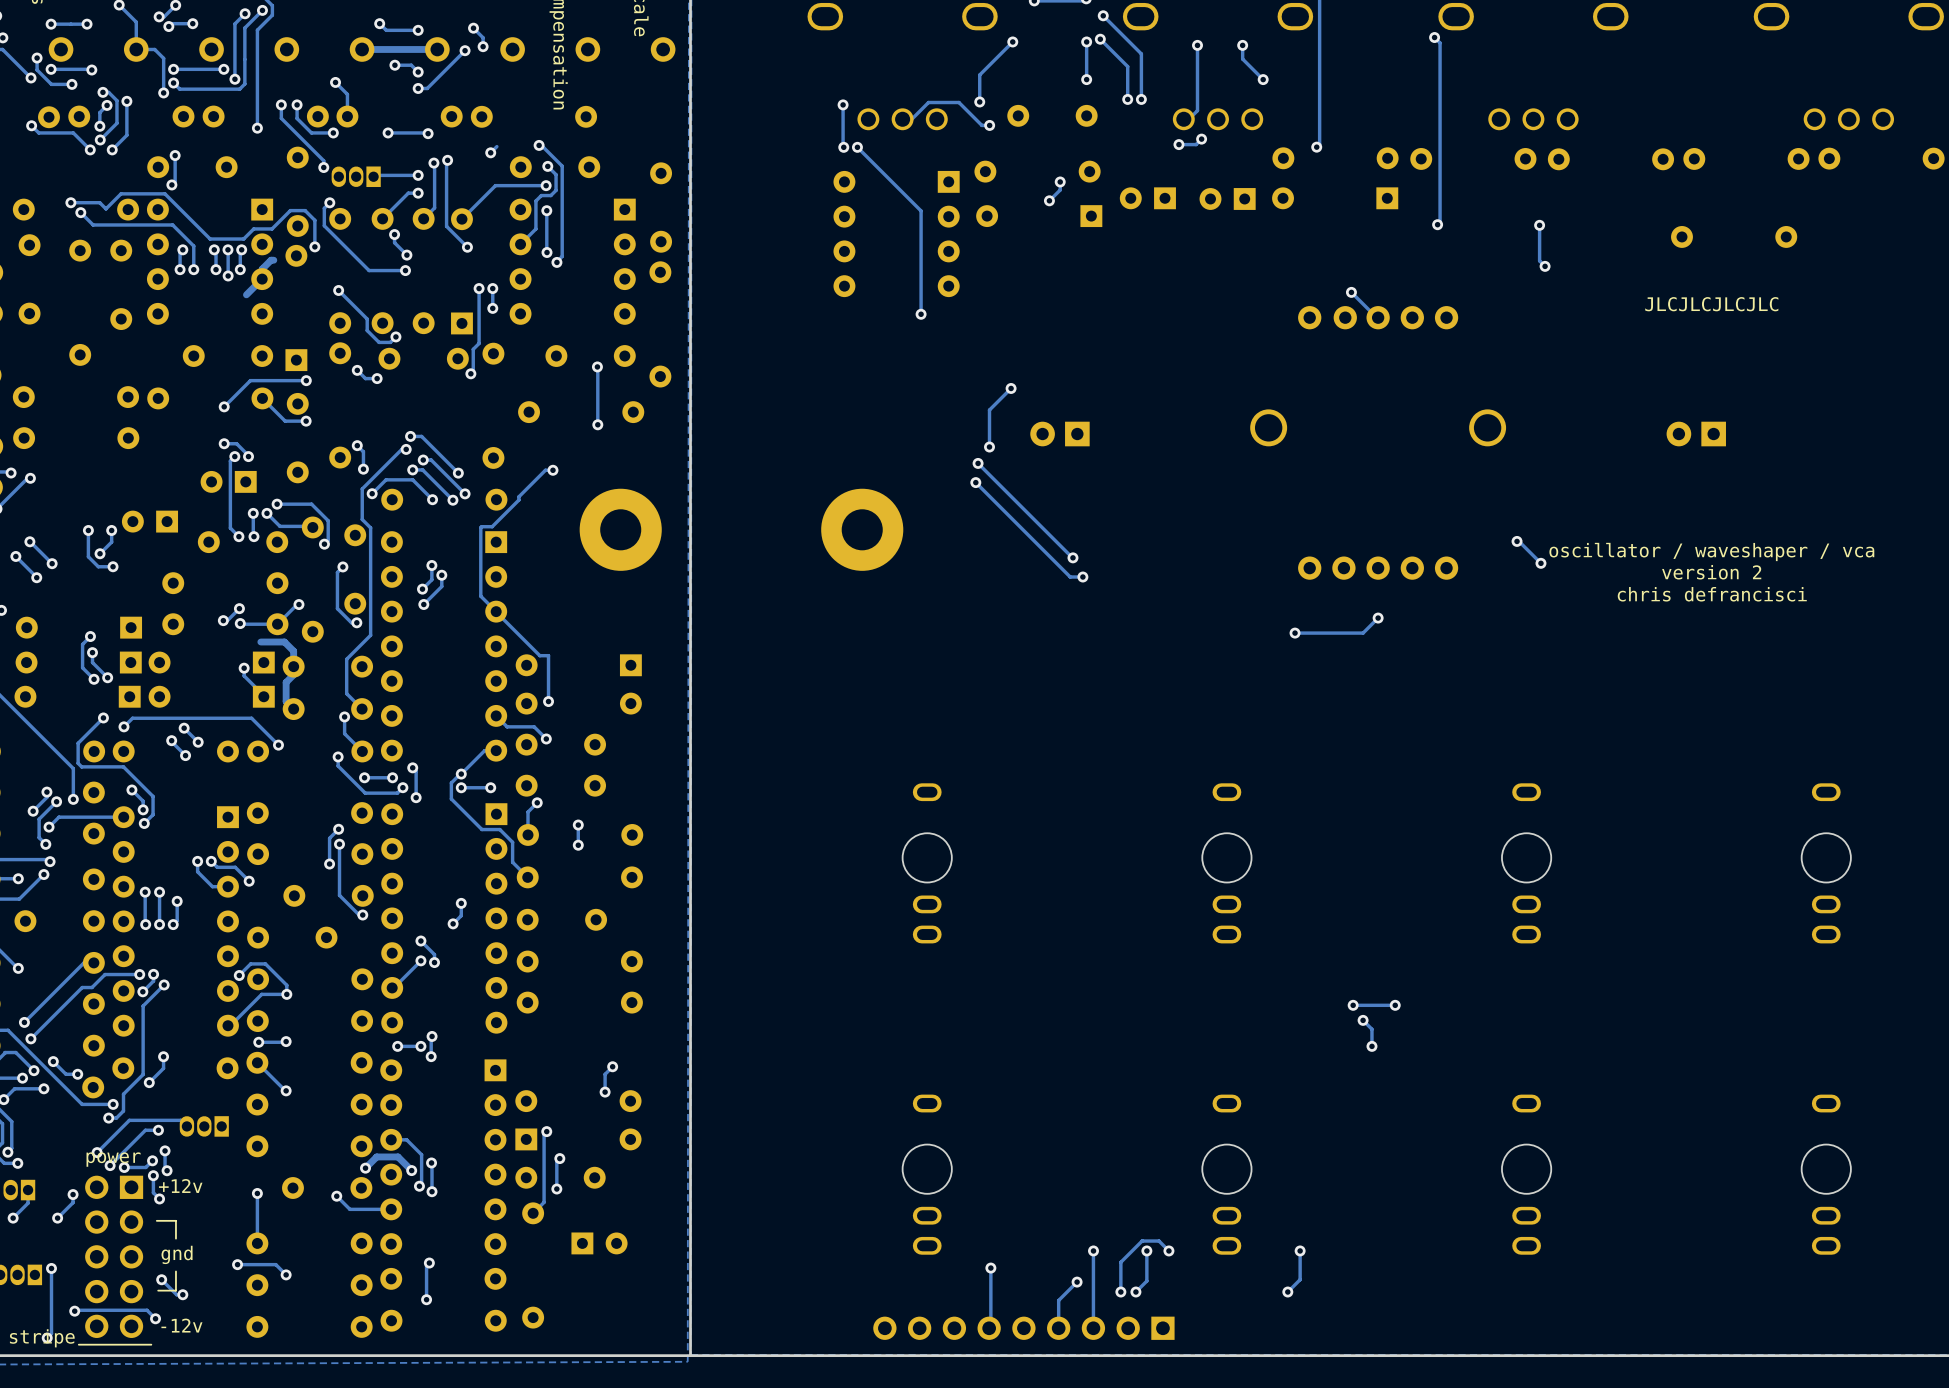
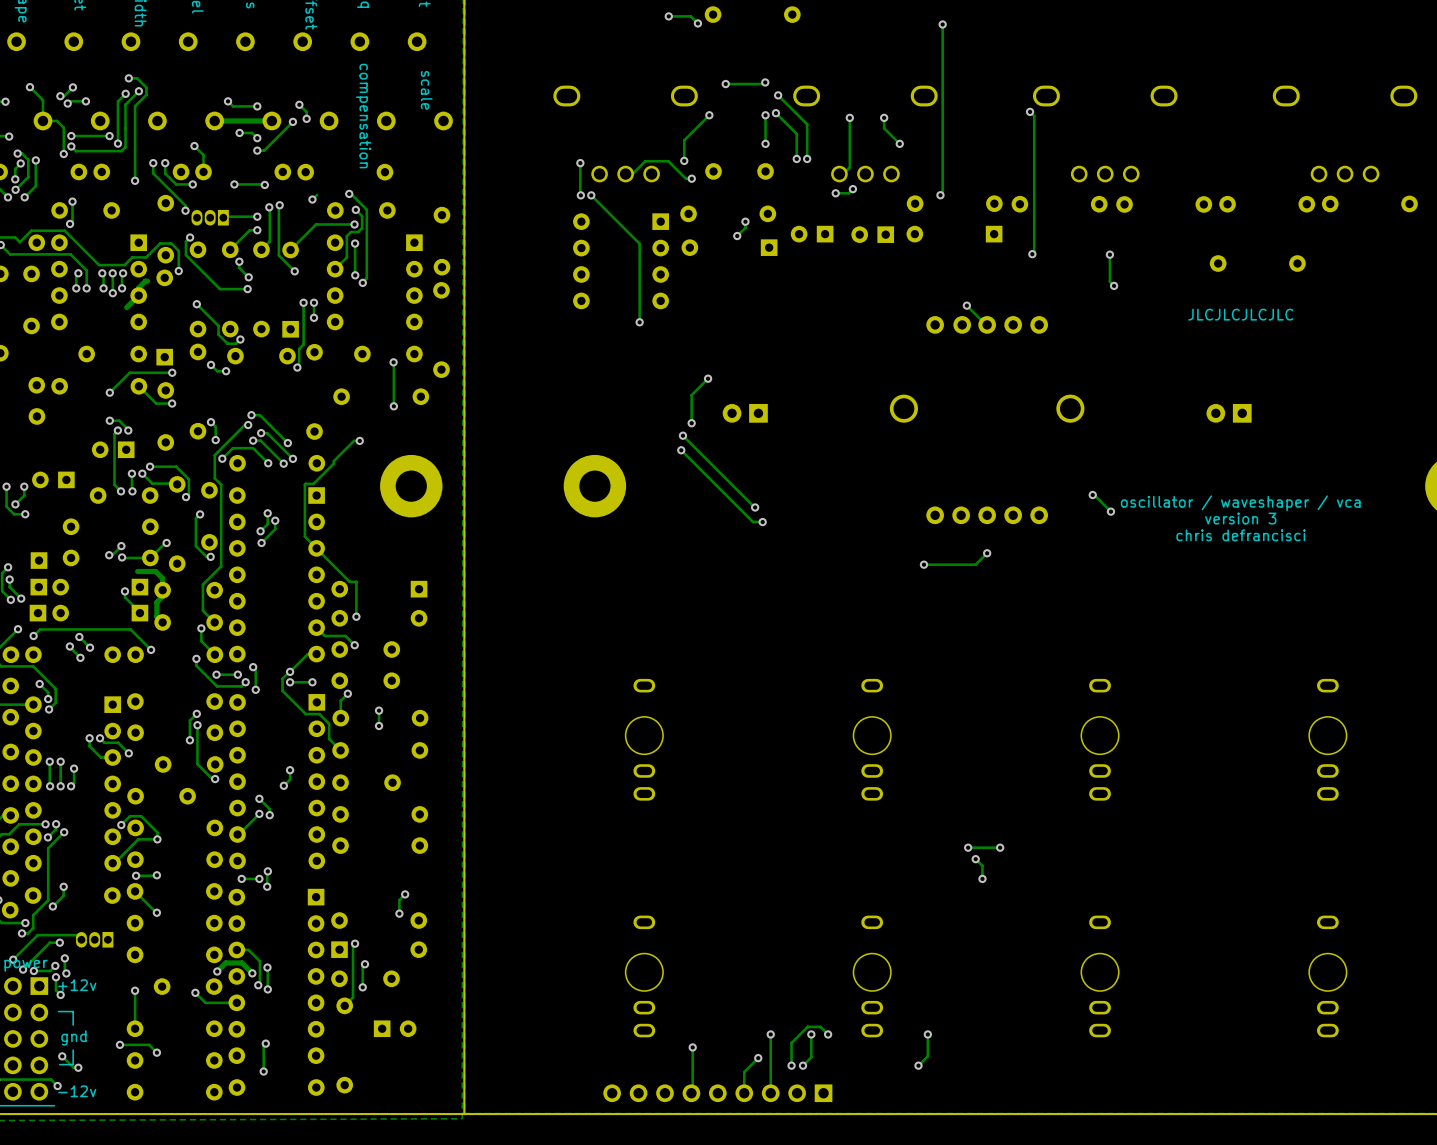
text: version 2 (1711, 572) -> version 3 (1240, 518)

